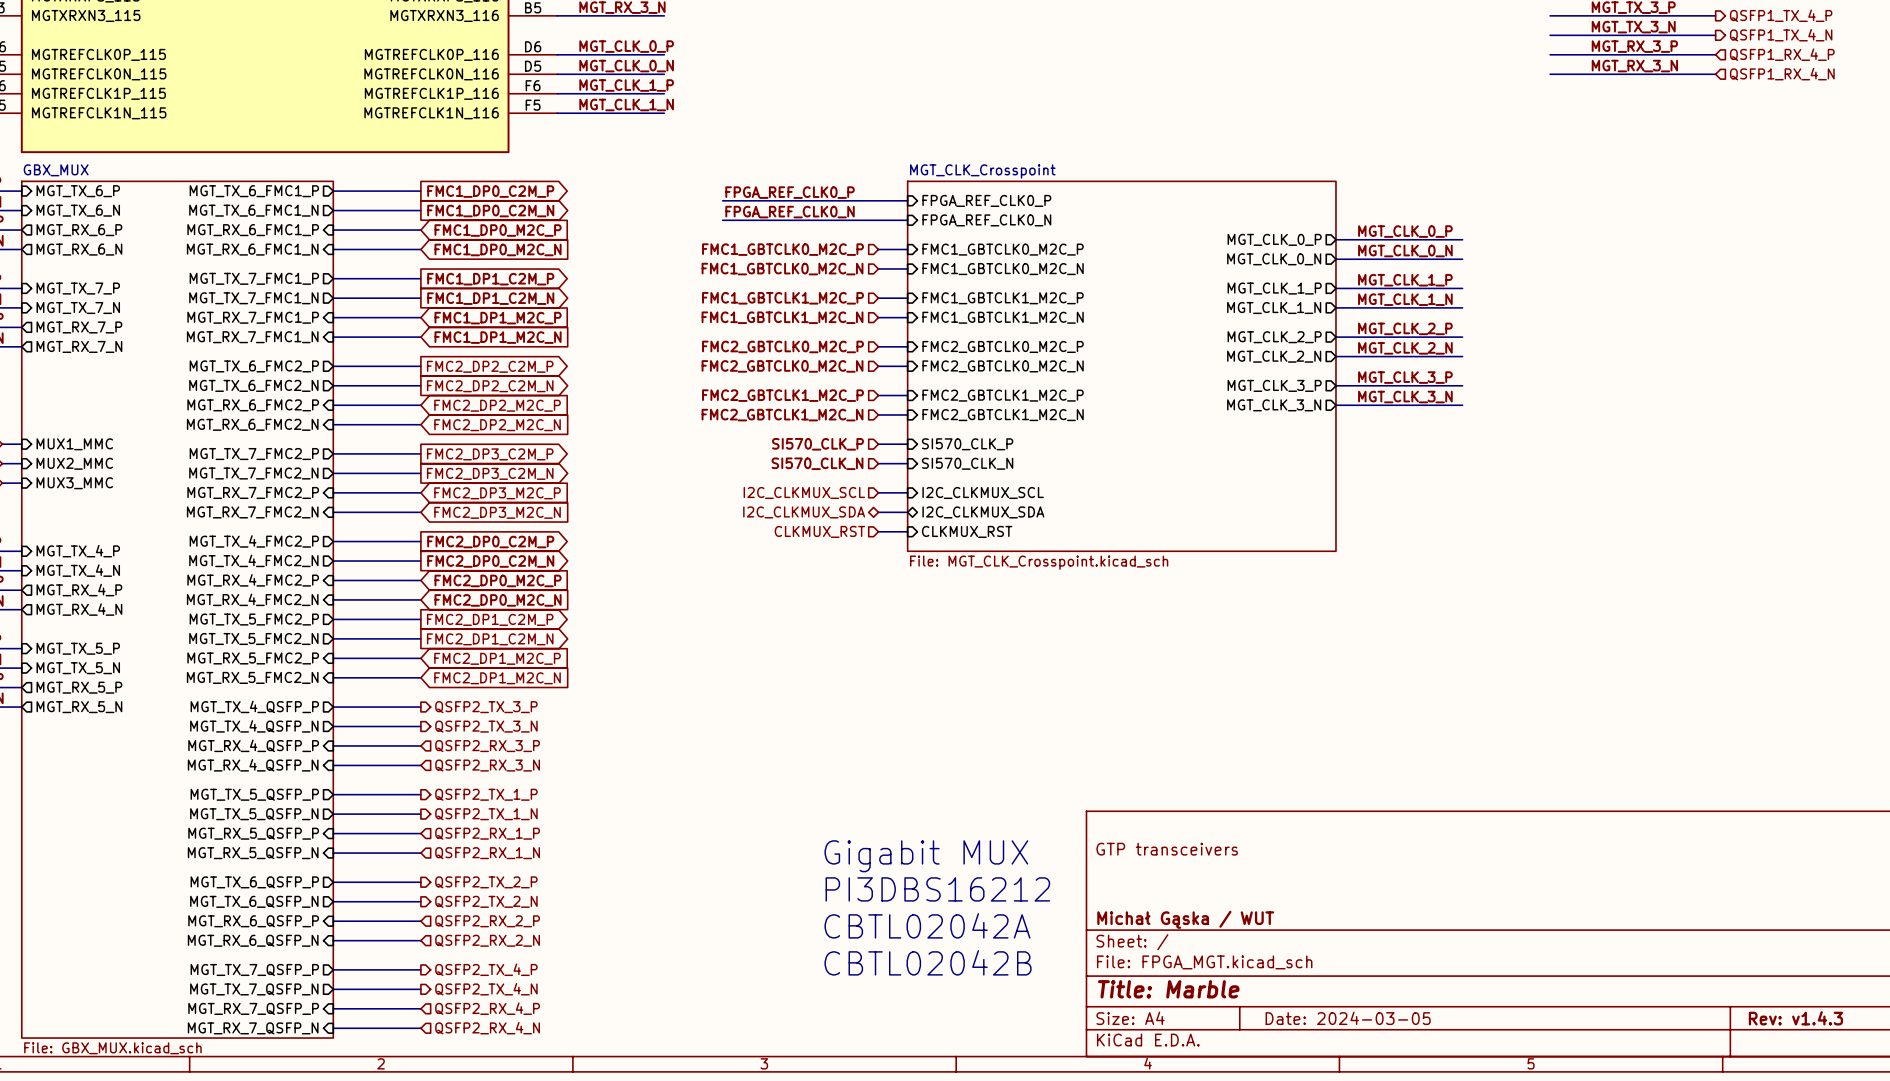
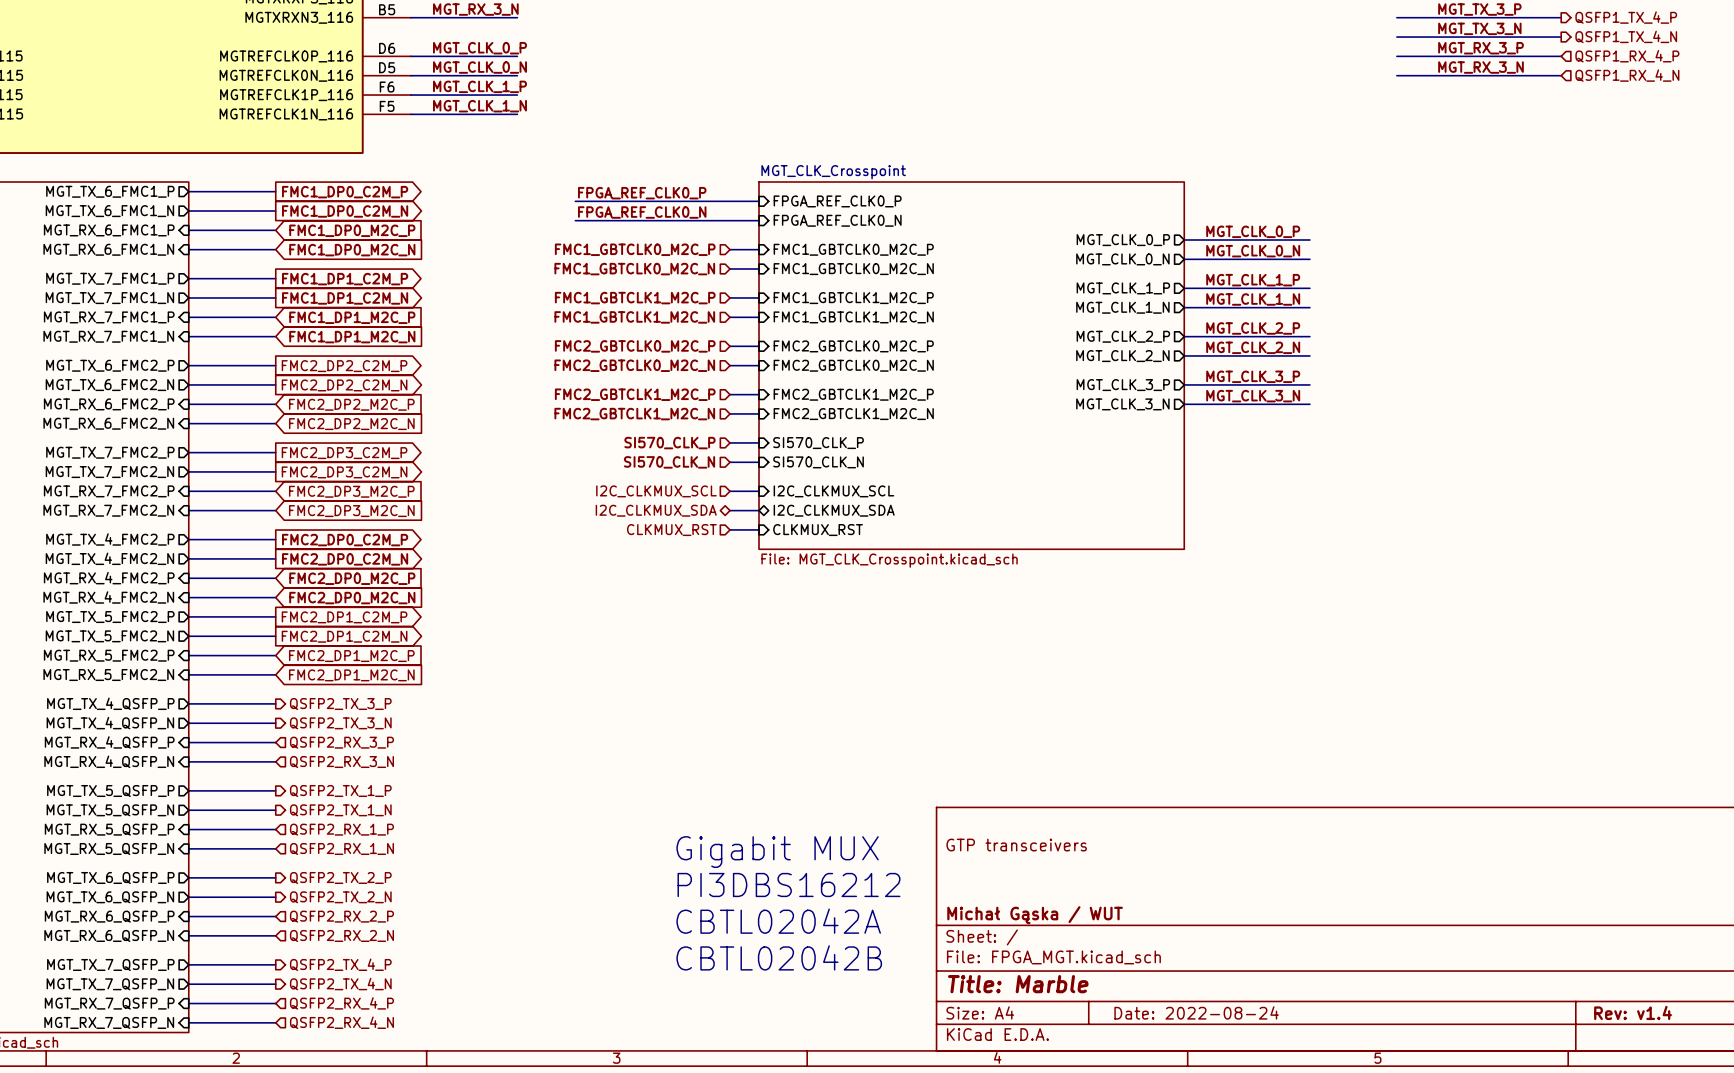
title block: Date: 2024-03-05 (1348, 1018) -> Date: 2022-08-24 (1196, 1012)
title block: Rev: v1.4.3 (1795, 1018) -> Rev: v1.4 (1633, 1012)

